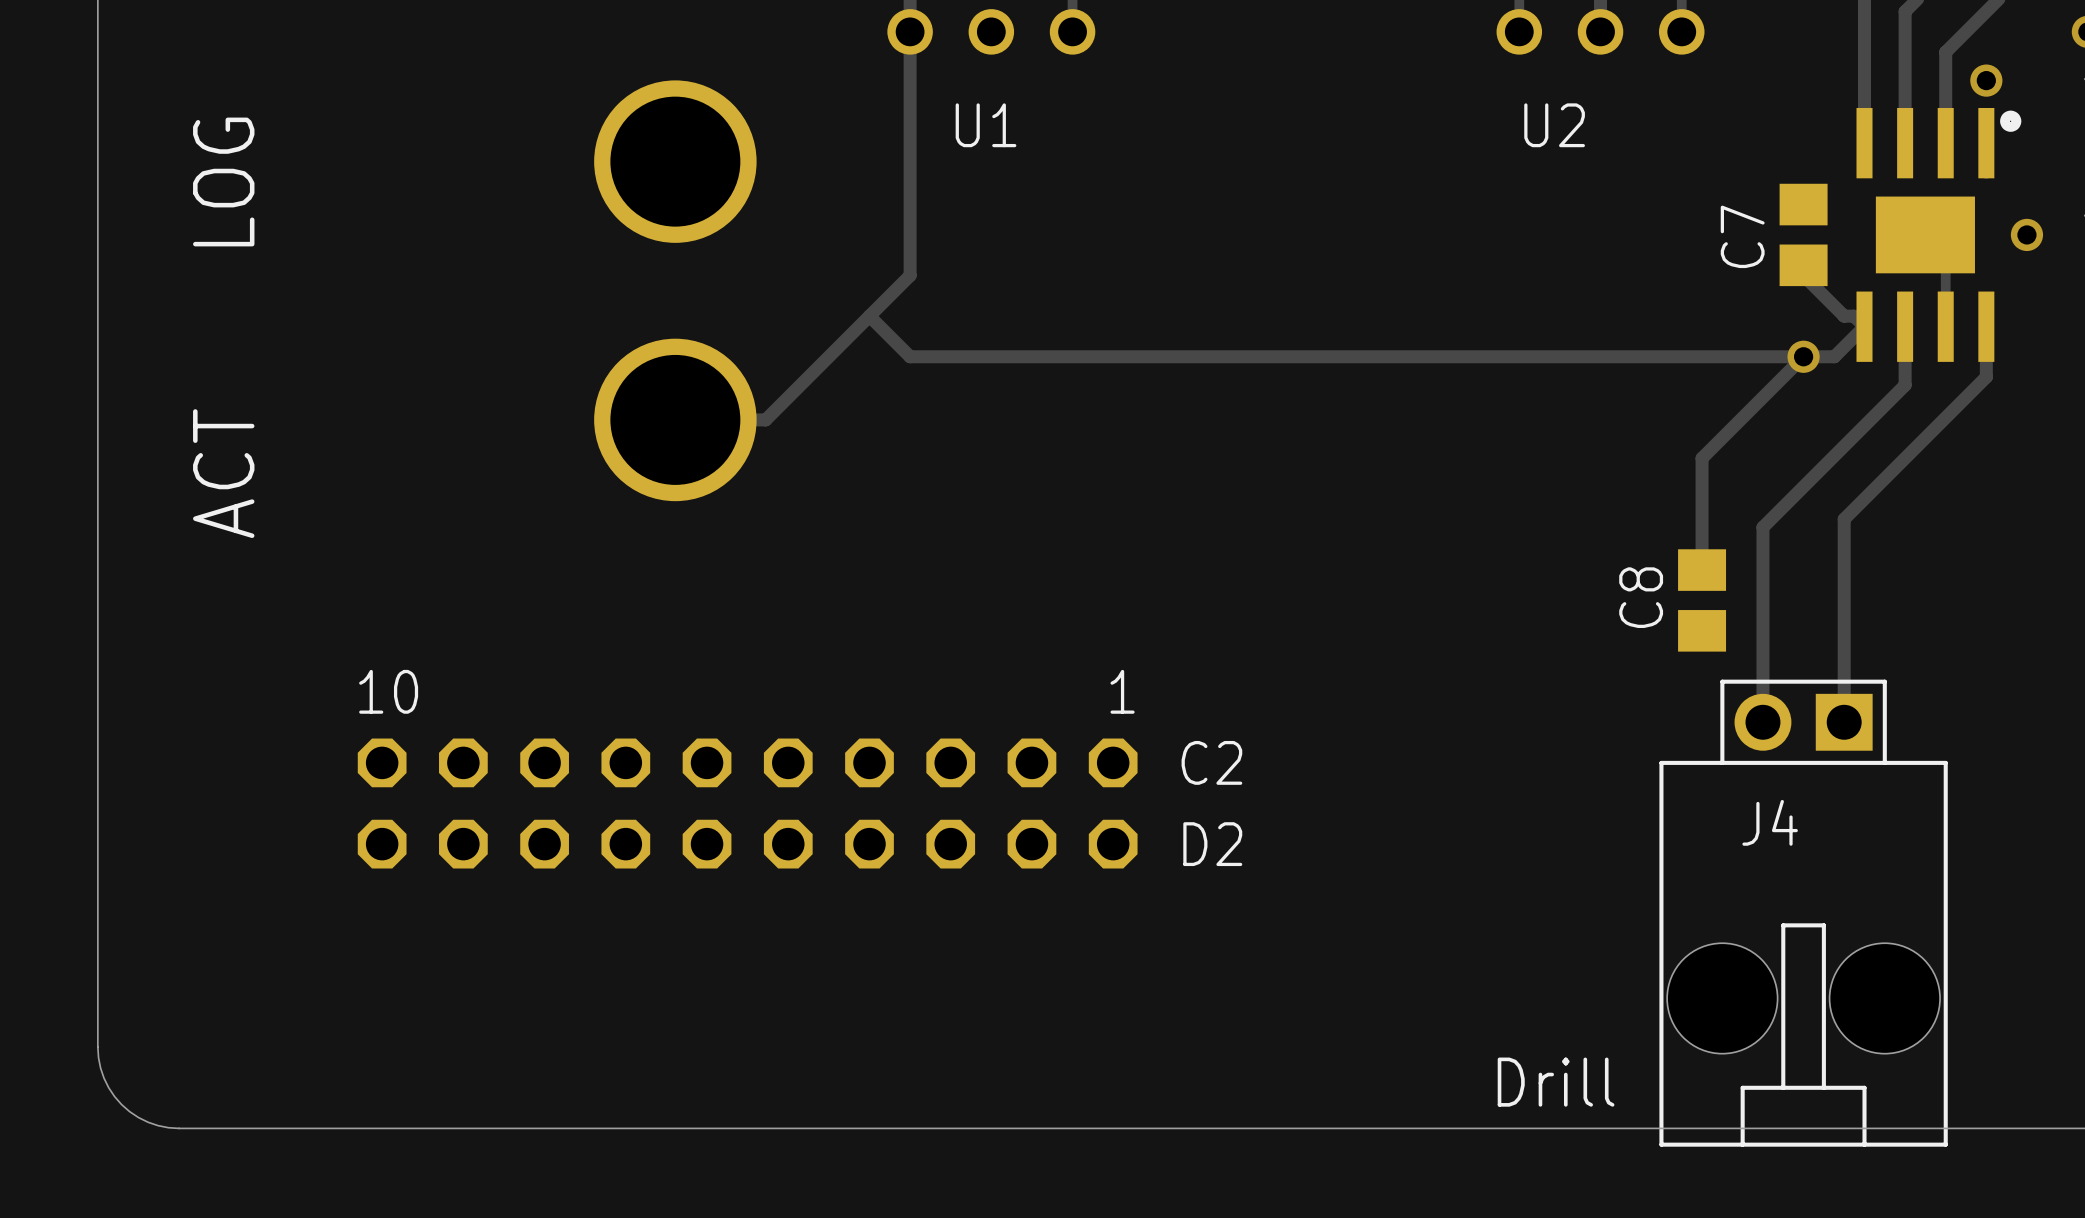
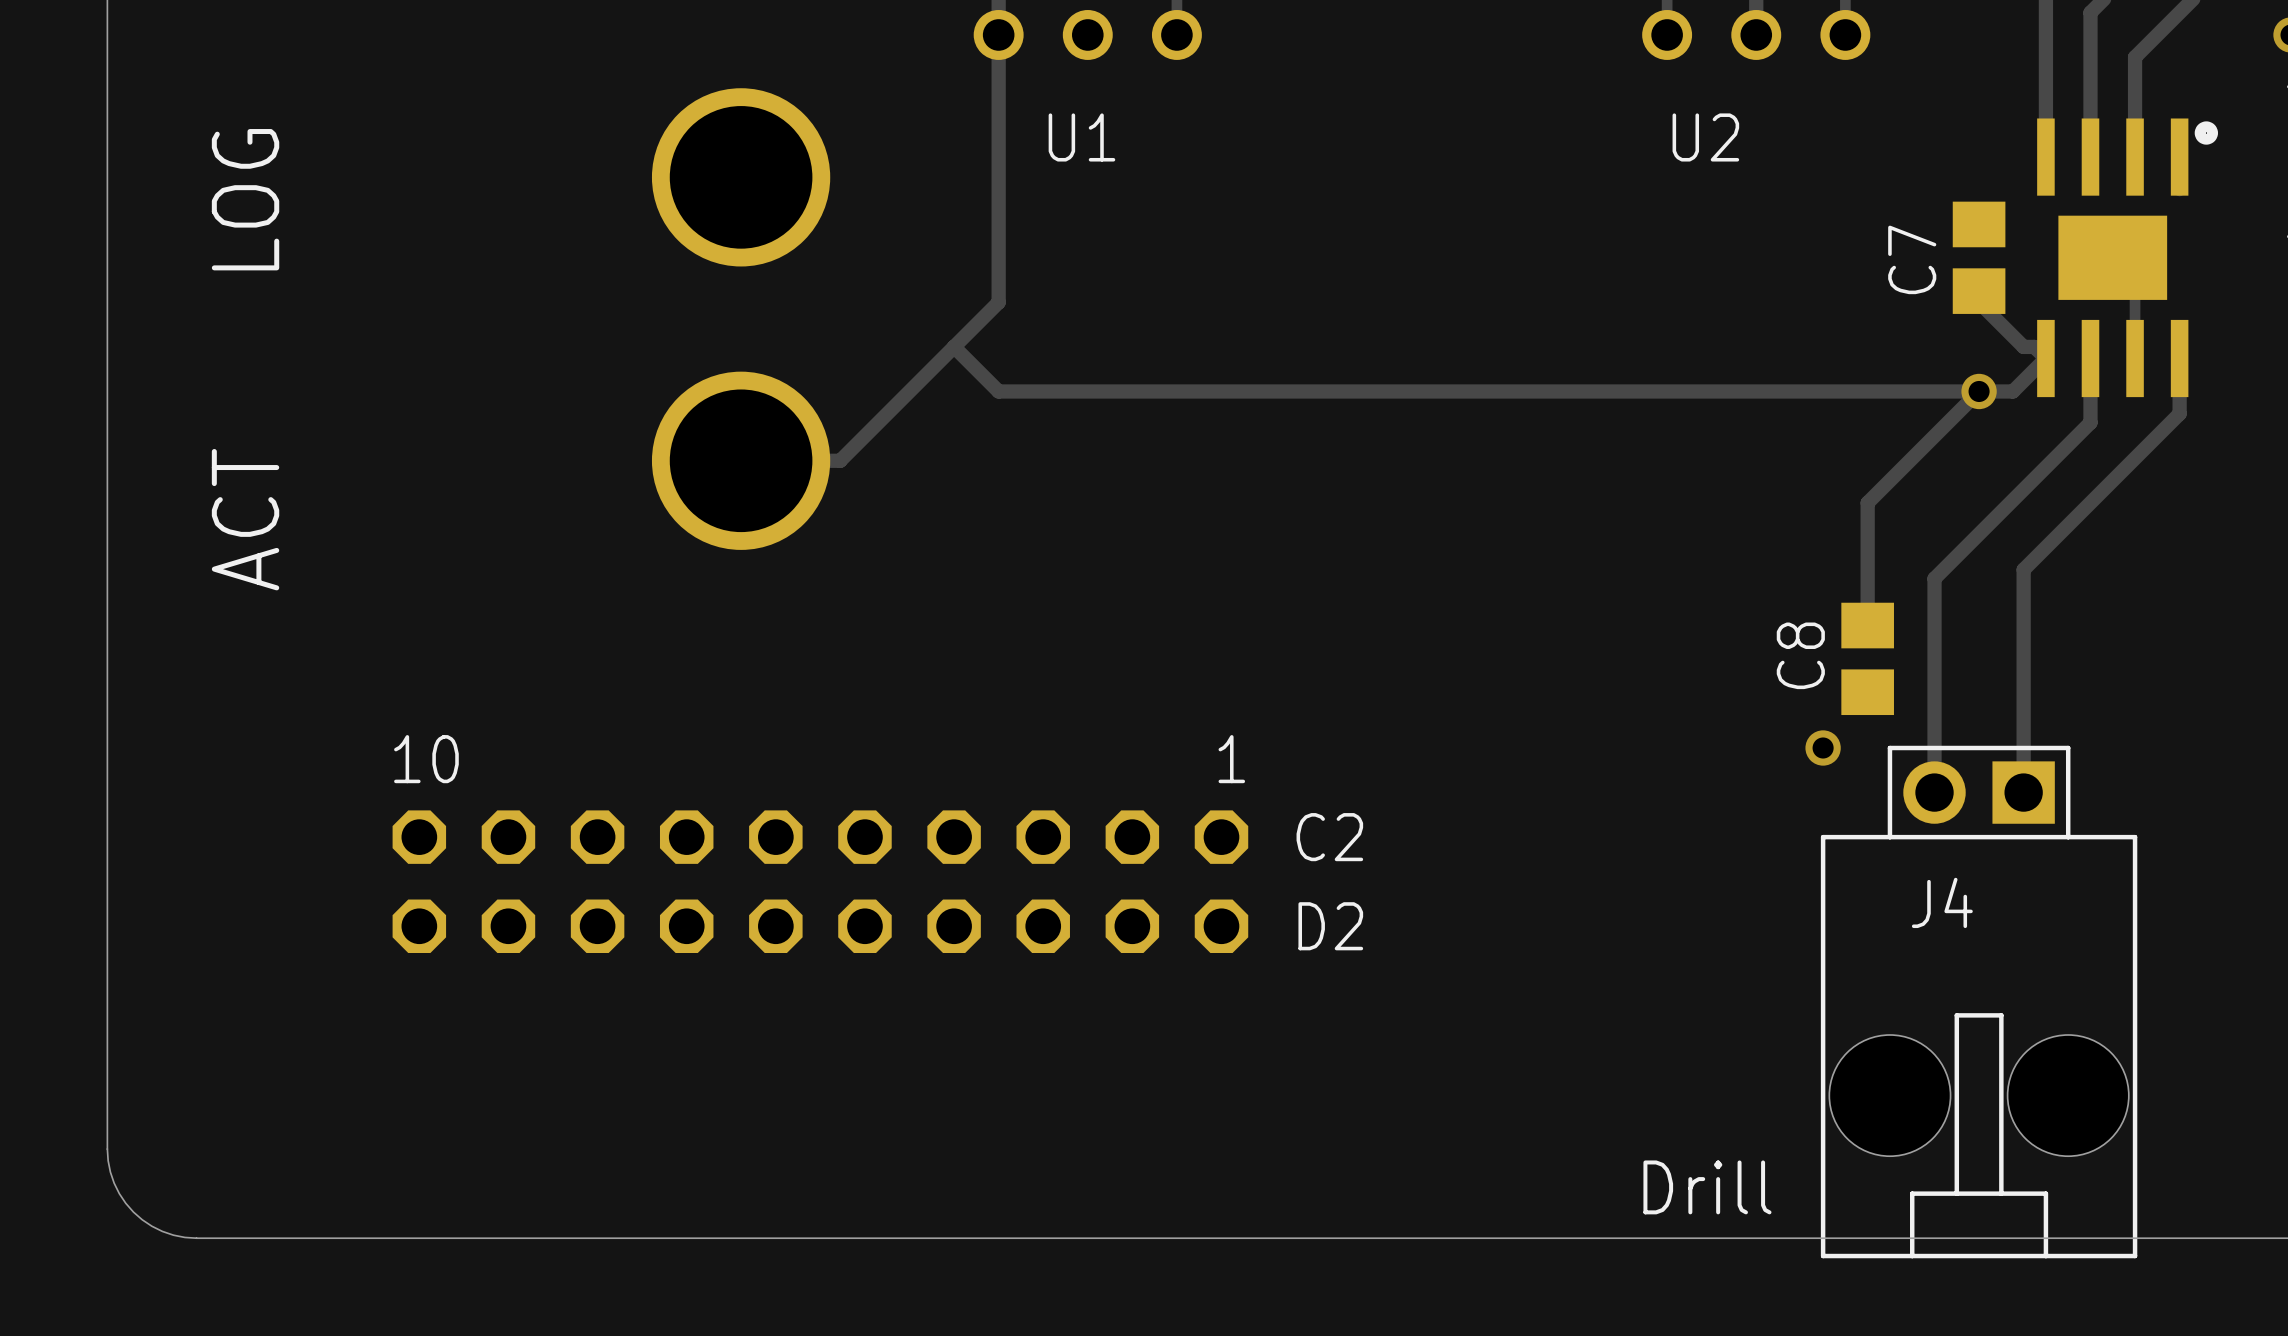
via: (1986, 80) -> none
via: (2026, 234) -> none
via: none -> (1823, 748)

